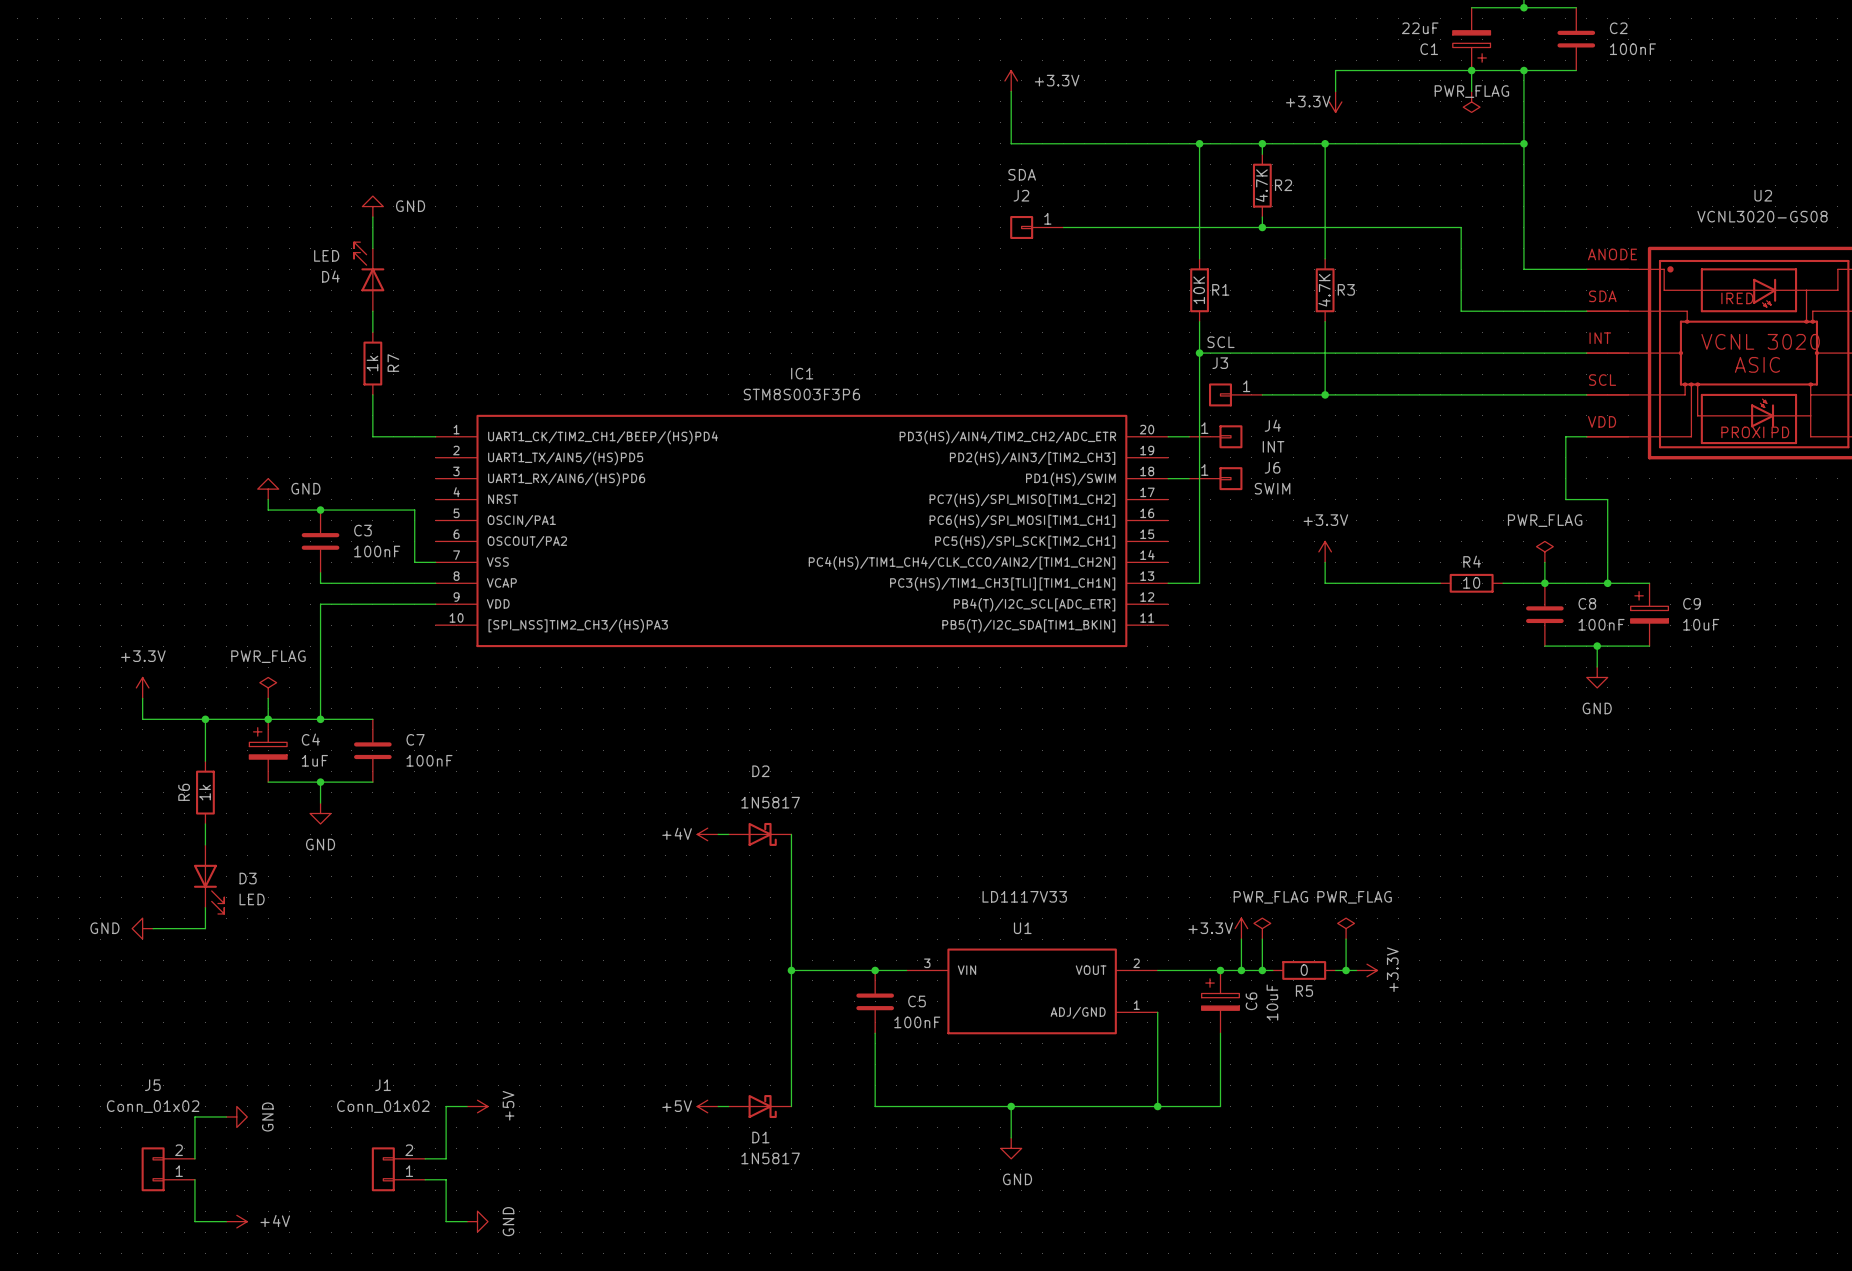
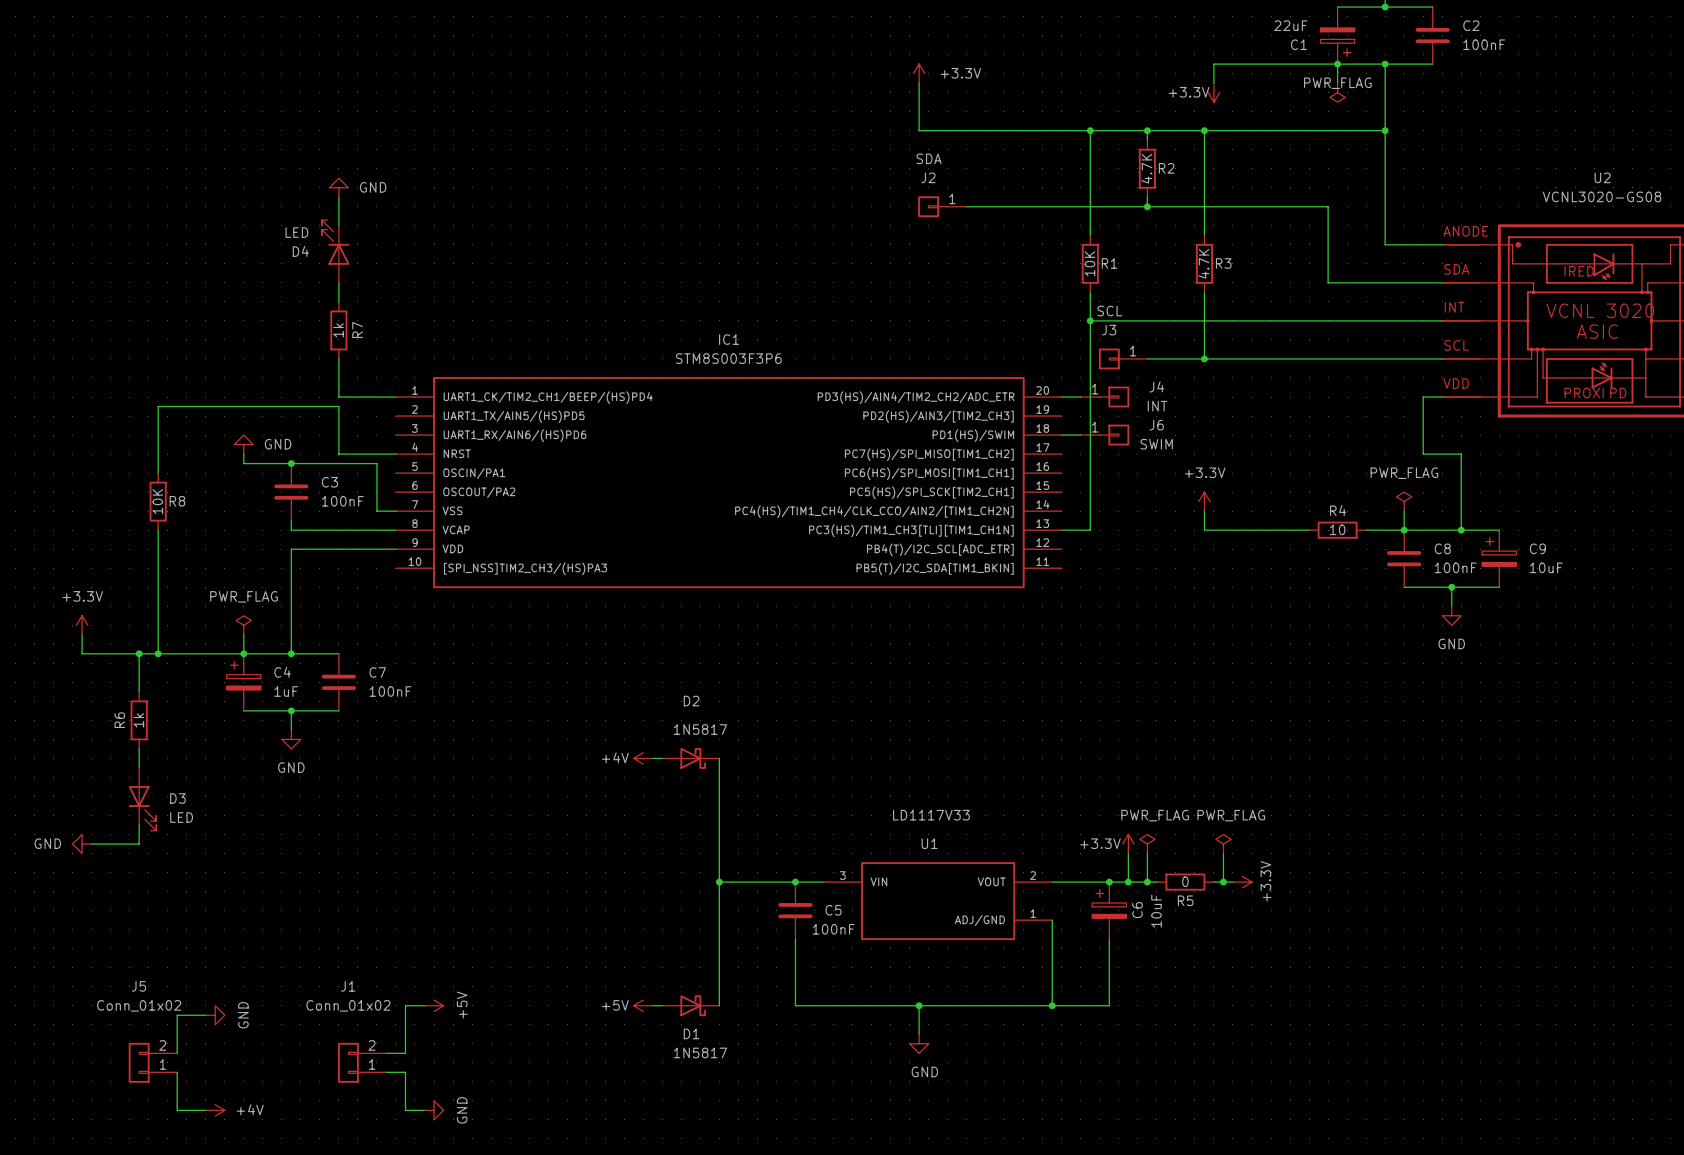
wire: none -> (395, 454) (338, 454) (338, 406) (158, 406) (158, 473)
R8: none -> 10K (158, 501)
wire: none -> (158, 530) (158, 653)
power symbol position: +3.3V (142, 687) -> +3.3V (82, 625)
wire: (142, 698) (142, 719) -> (82, 634) (82, 653) (129, 653)
junction: none -> (139, 653)
junction: none -> (158, 653)
wire: (205, 719) (205, 761) -> (139, 653) (139, 691)
junction: (205, 719) -> none
R6 position: (205, 792) -> (139, 720)
wire: (205, 823) (205, 844) -> (139, 748) (139, 767)
D3 position: (209, 879) -> (142, 799)
wire: (205, 907) (205, 928) (153, 928) -> (139, 825) (139, 844) (91, 844)
power symbol position: GND (142, 928) -> GND (82, 844)

